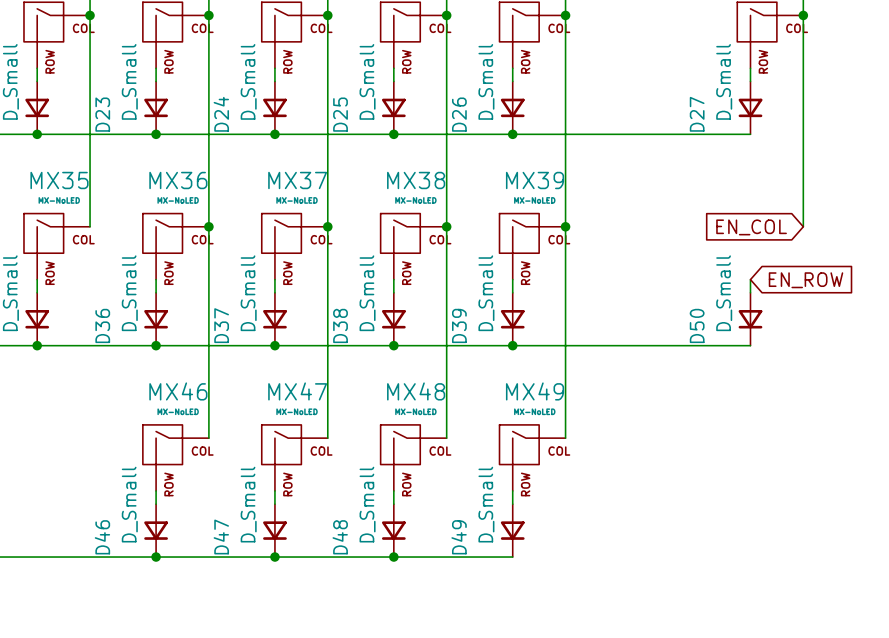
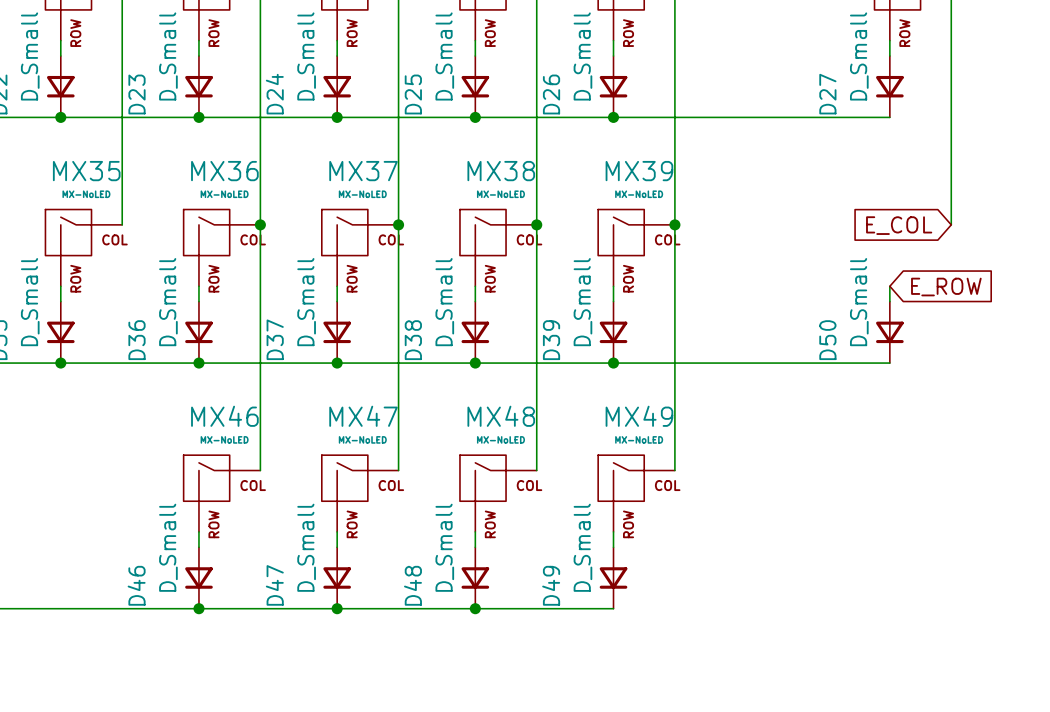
global label: EN_COL (751, 227) -> E_COL (899, 225)
global label: EN_ROW (806, 280) -> E_ROW (946, 287)

